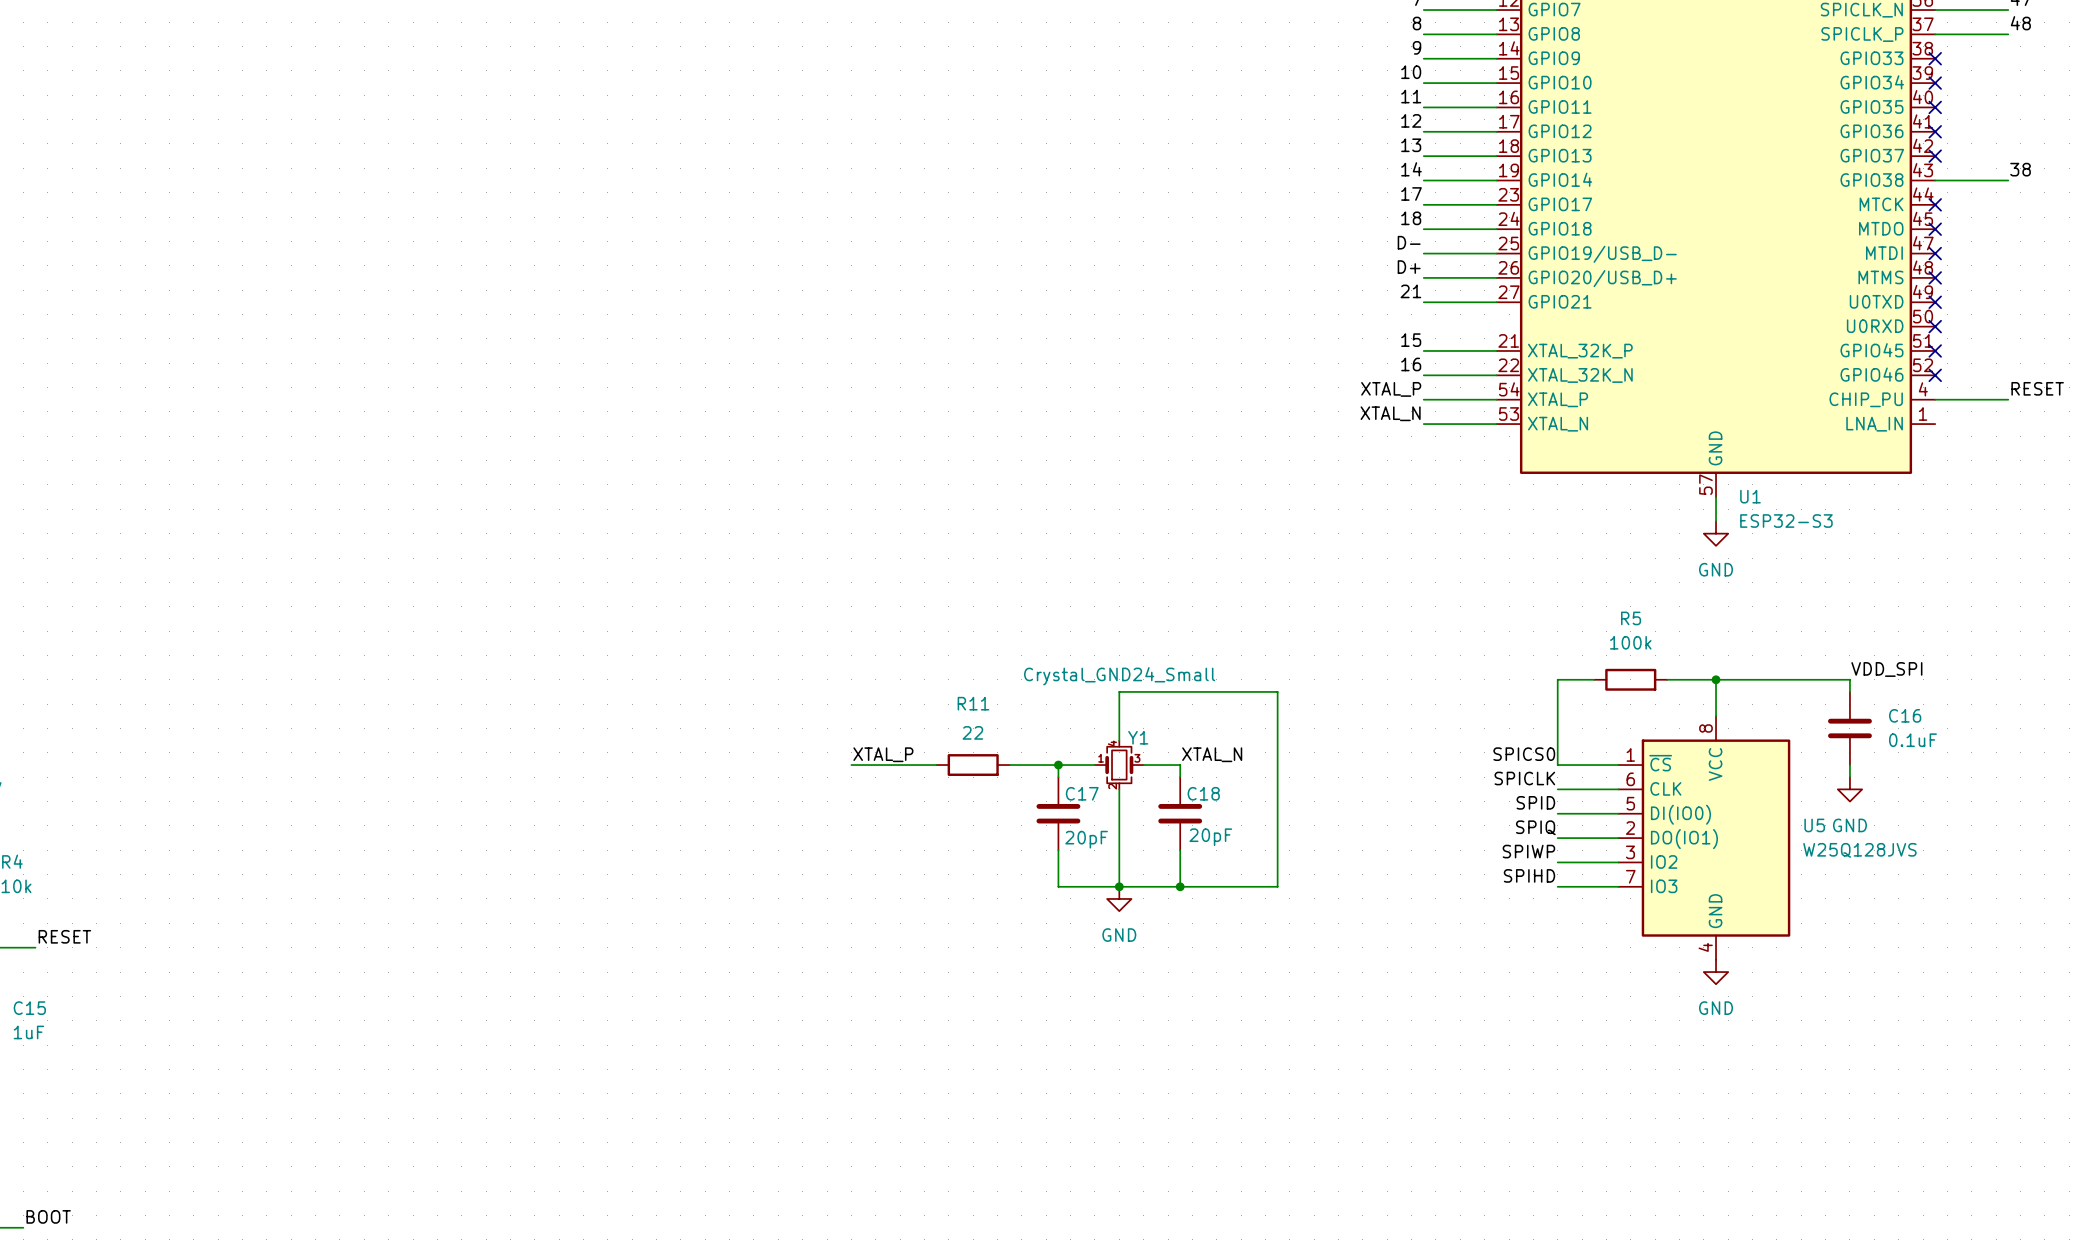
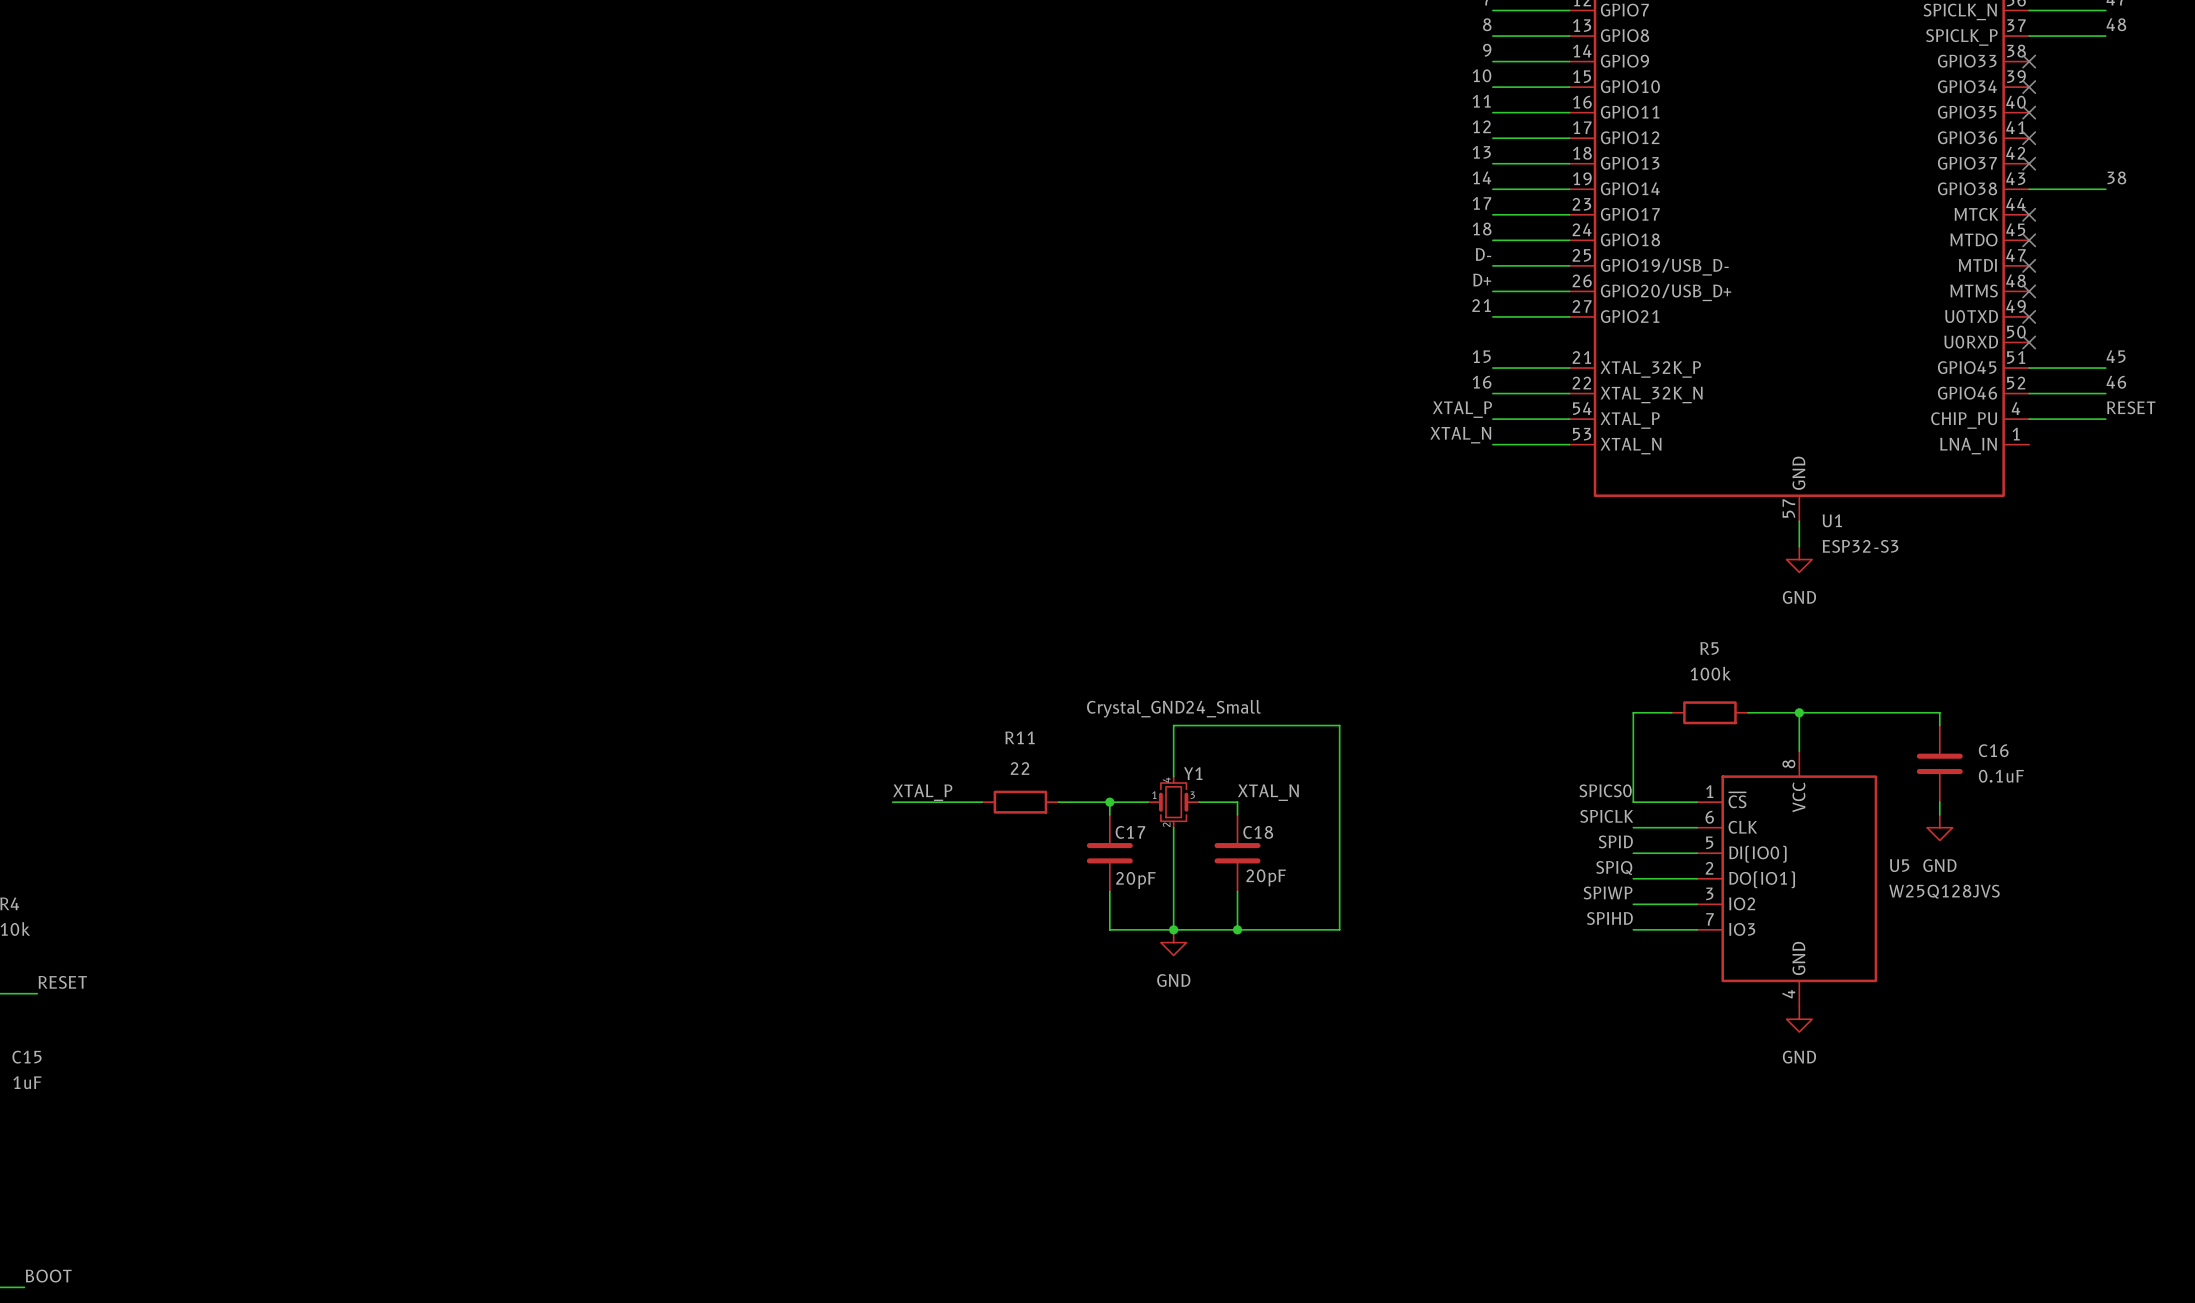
label: none -> 45 (2116, 356)
wire: none -> (2029, 368) (2105, 368)
no-connect mark: (1935, 350) -> none
label: none -> 46 (2116, 382)
wire: none -> (2029, 393) (2105, 393)
no-connect mark: (1935, 375) -> none
label: VDD_SPI (1886, 669) -> none

